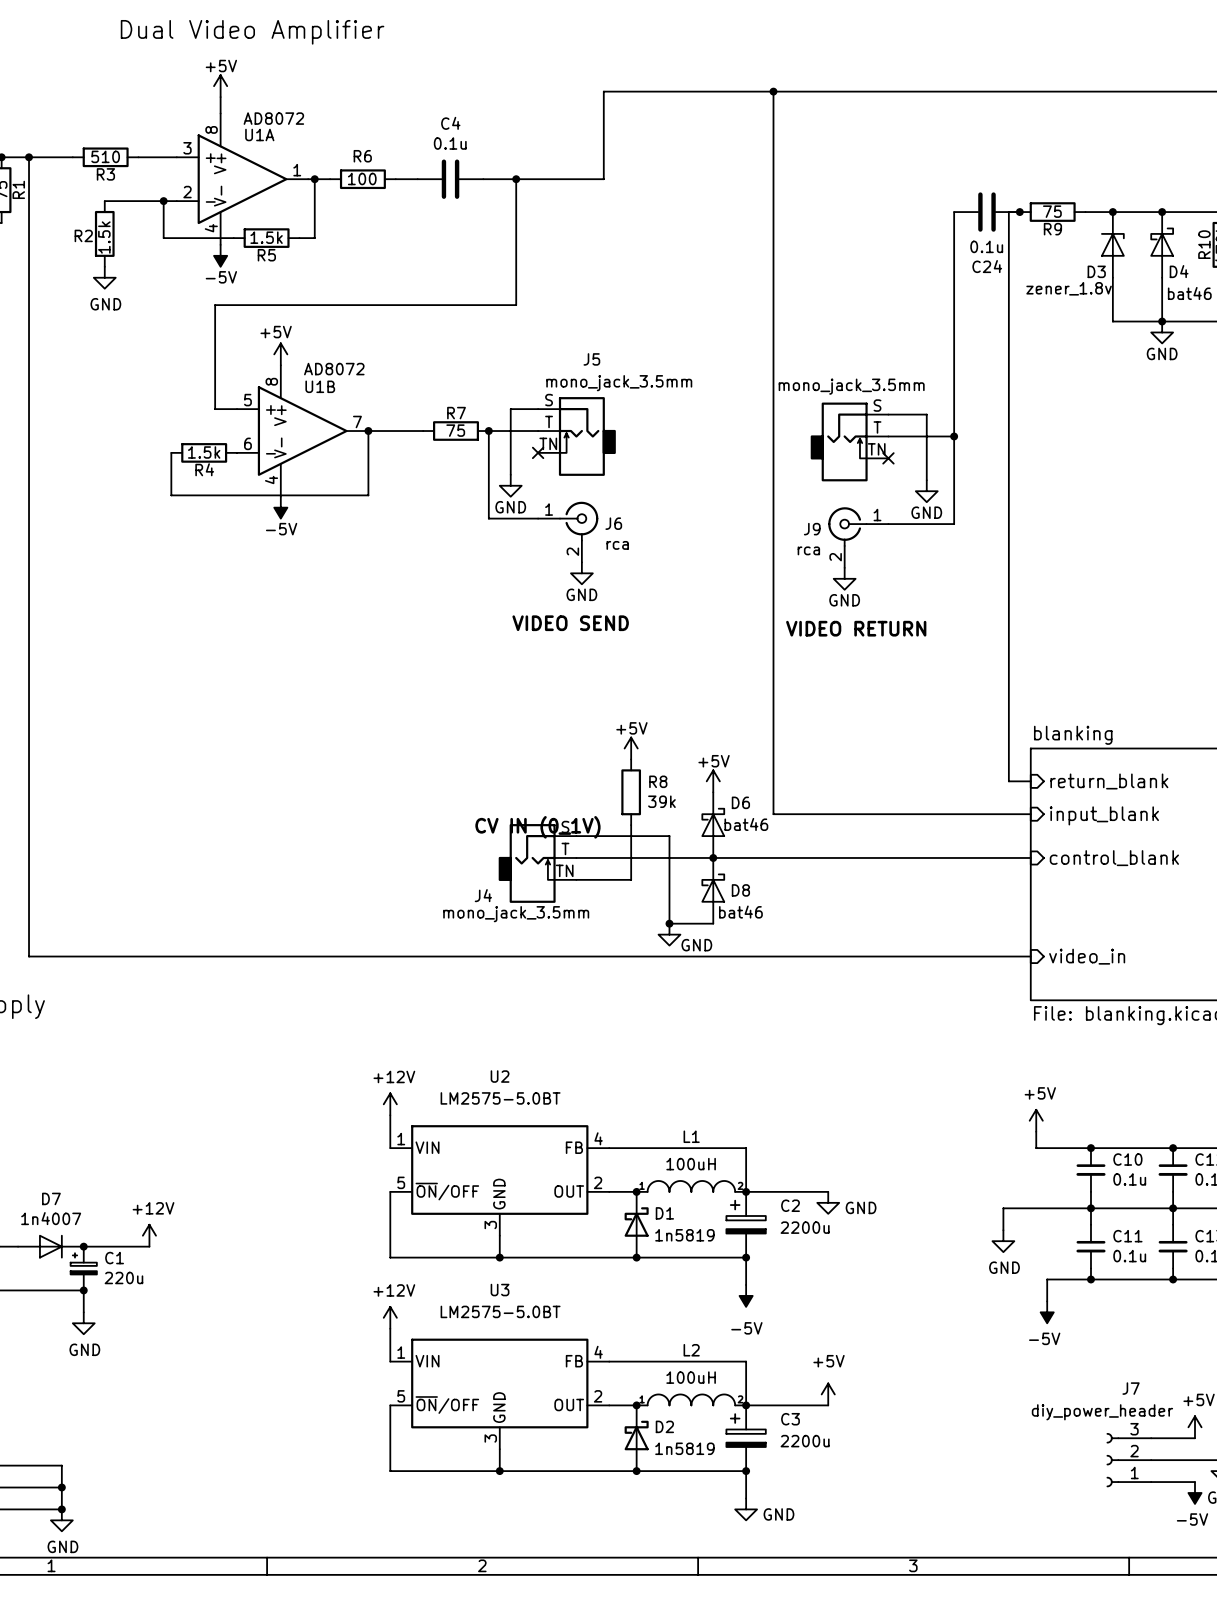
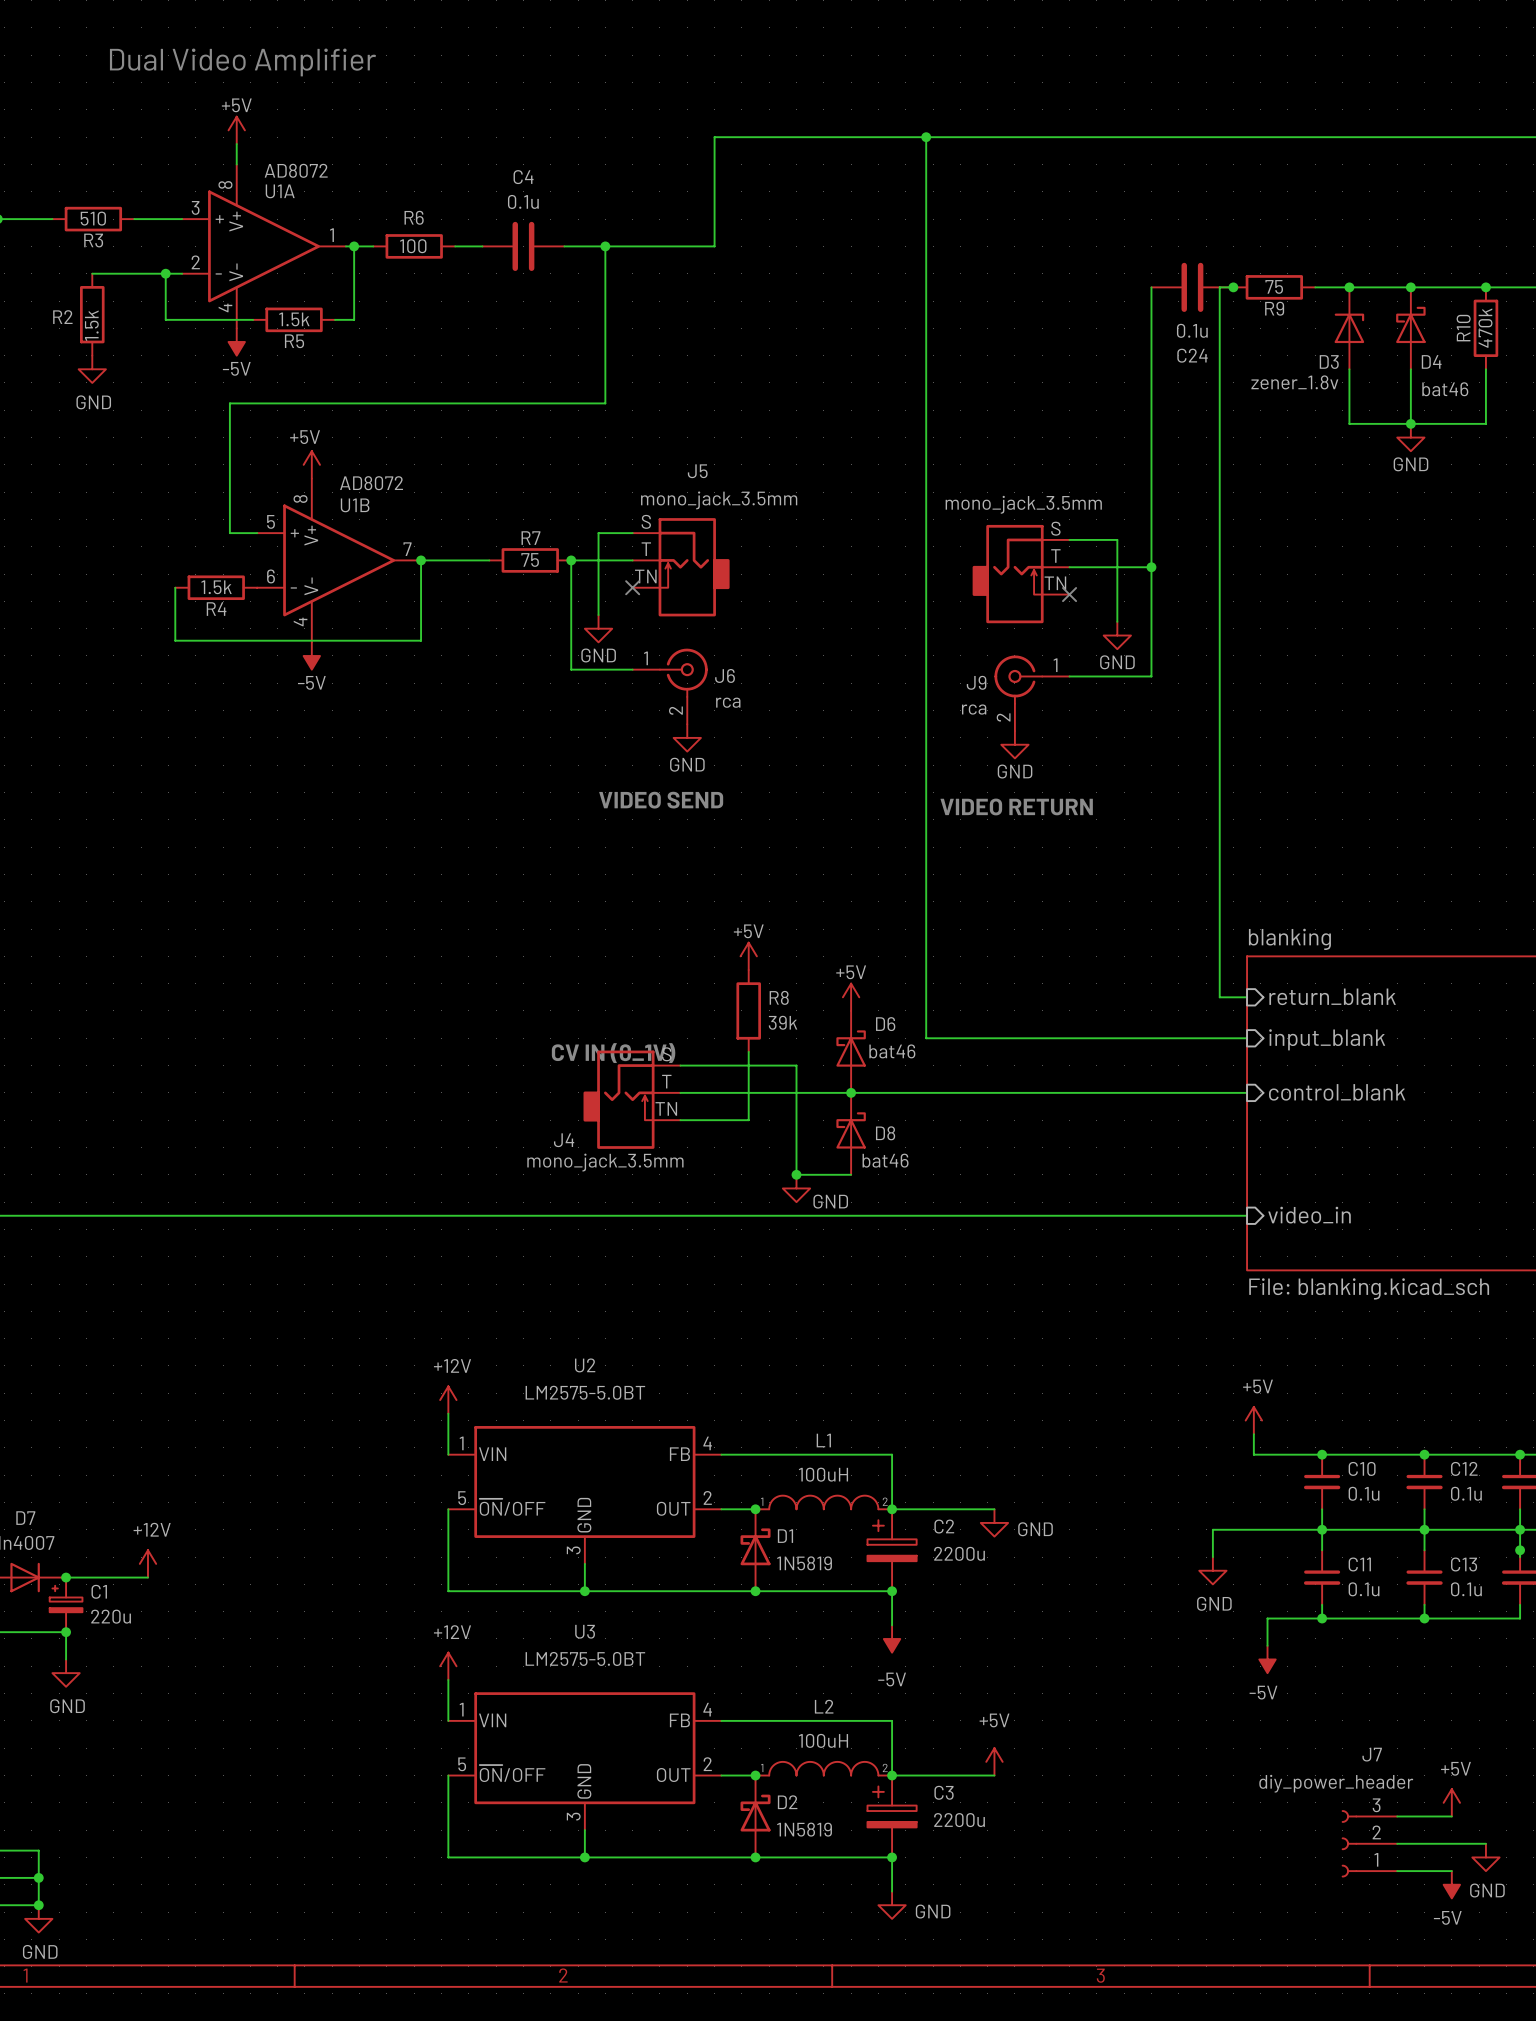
D1 value: 1n5819 (684, 1235) -> 1N5819 (804, 1563)
D2 value: 1n5819 (684, 1448) -> 1N5819 (804, 1829)

